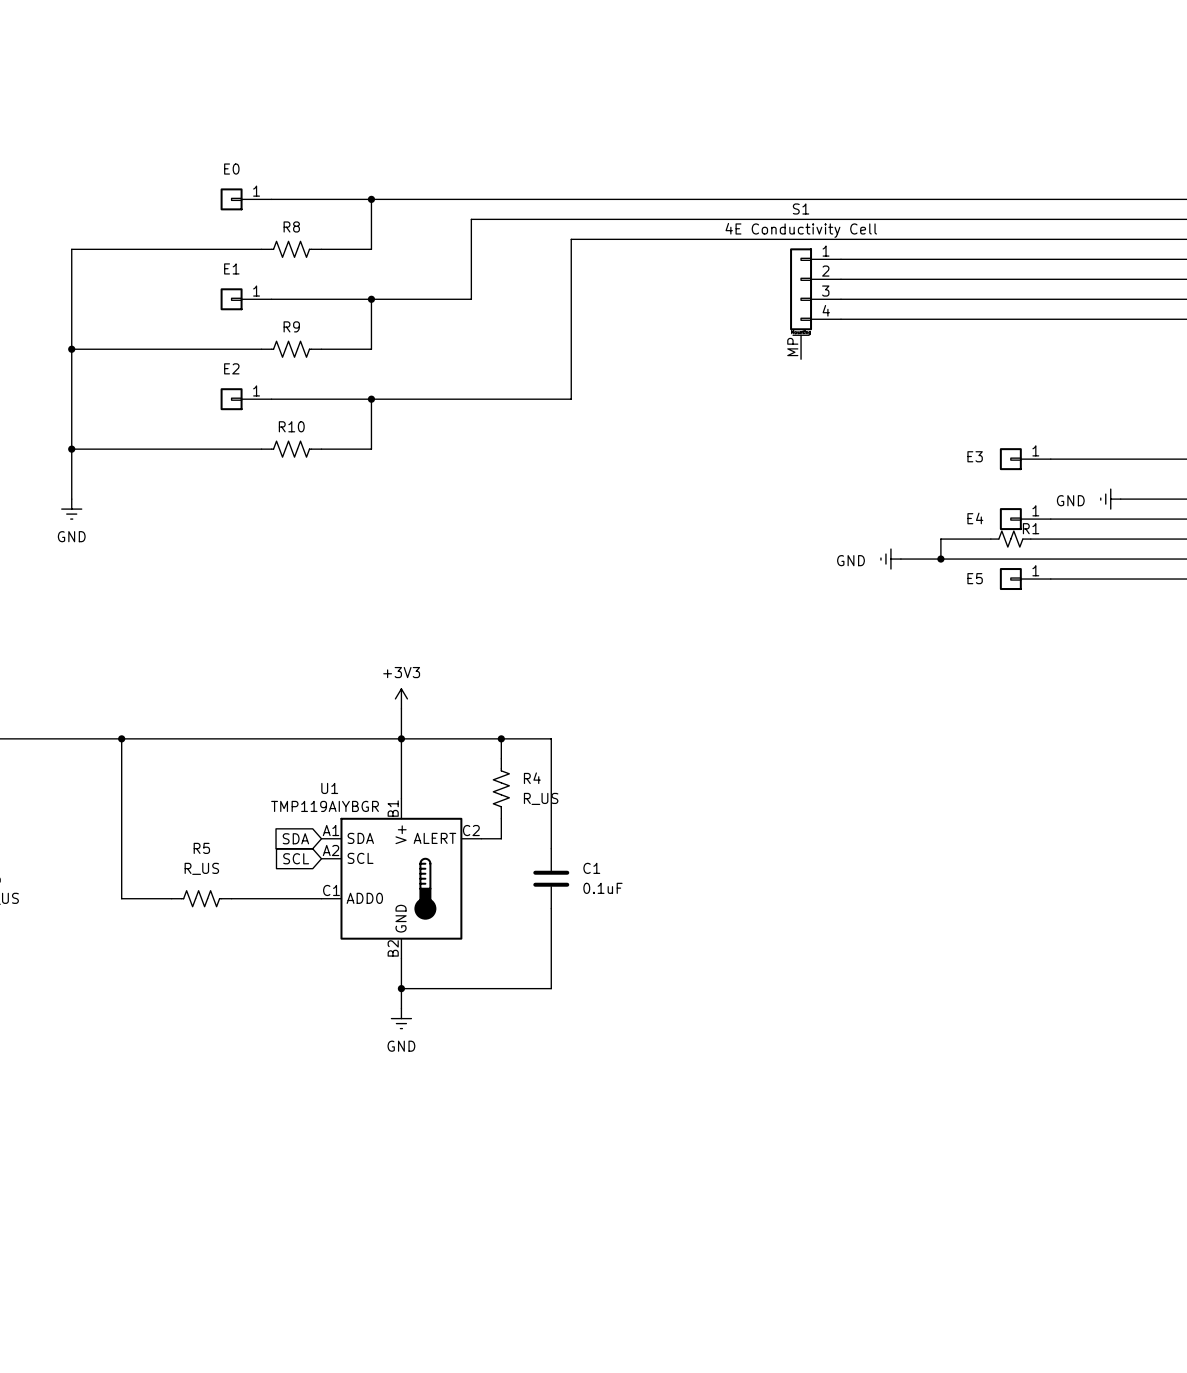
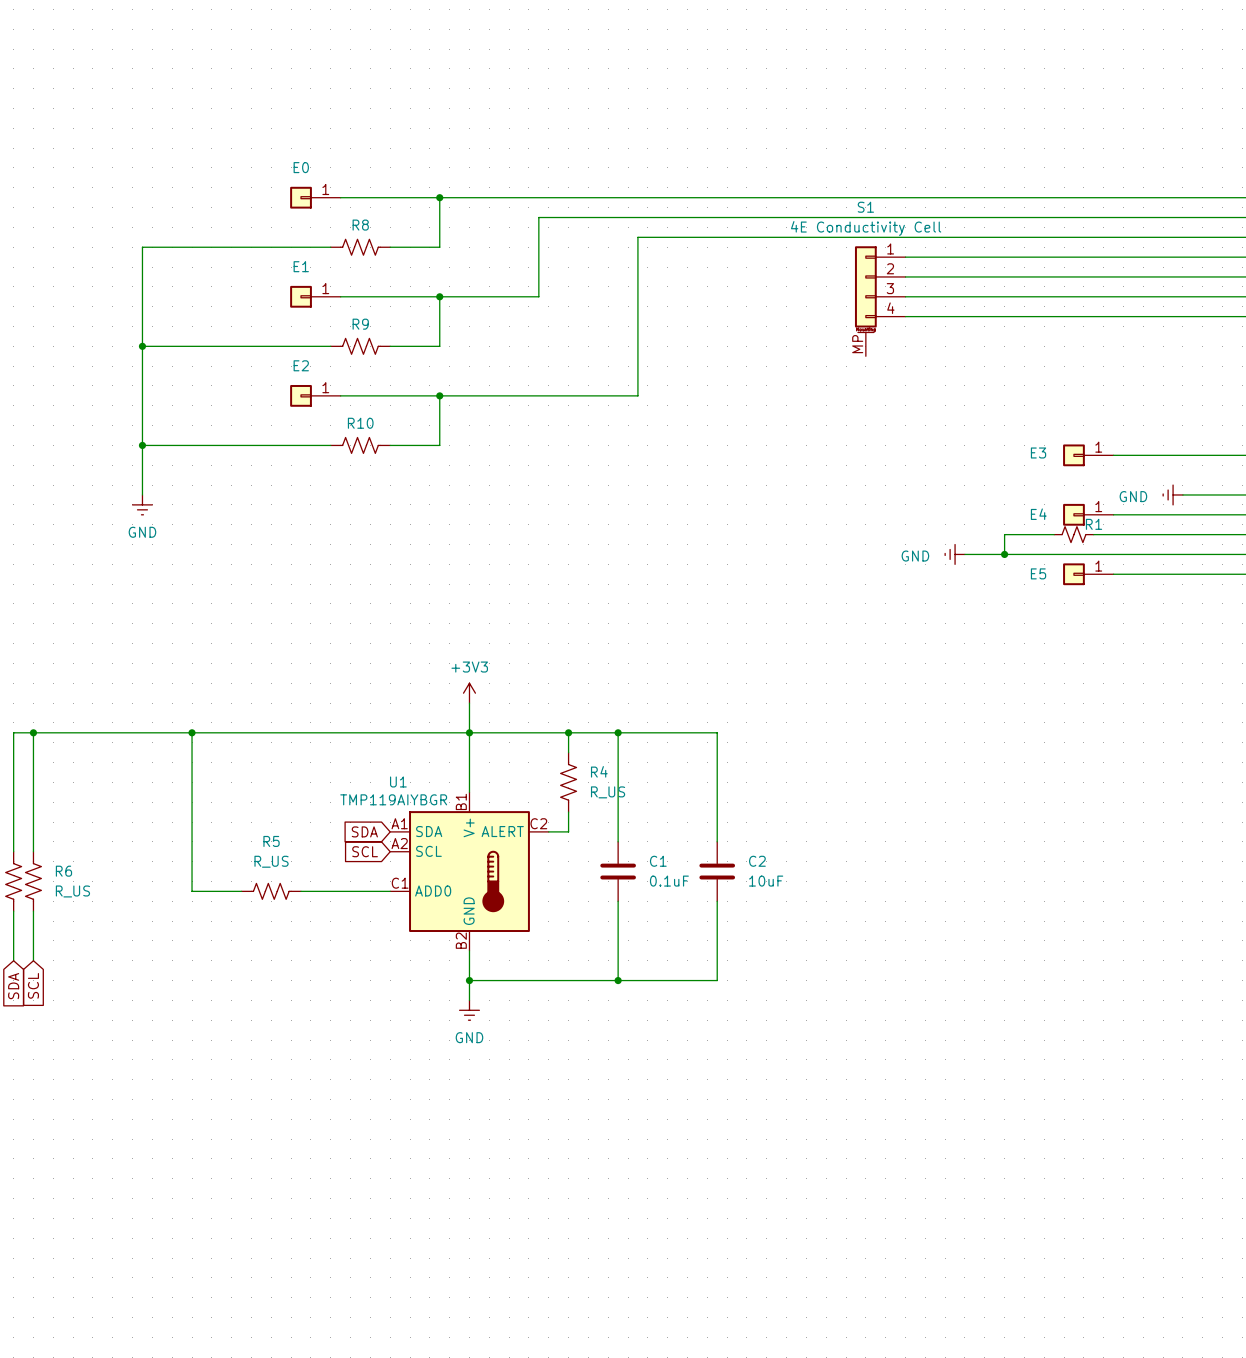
wire: none -> (618, 732) (717, 732) (717, 841)
junction: none -> (618, 732)
C2: none -> 10uF (717, 871)
wire: none -> (717, 901) (717, 980) (618, 980)
junction: none -> (618, 980)

